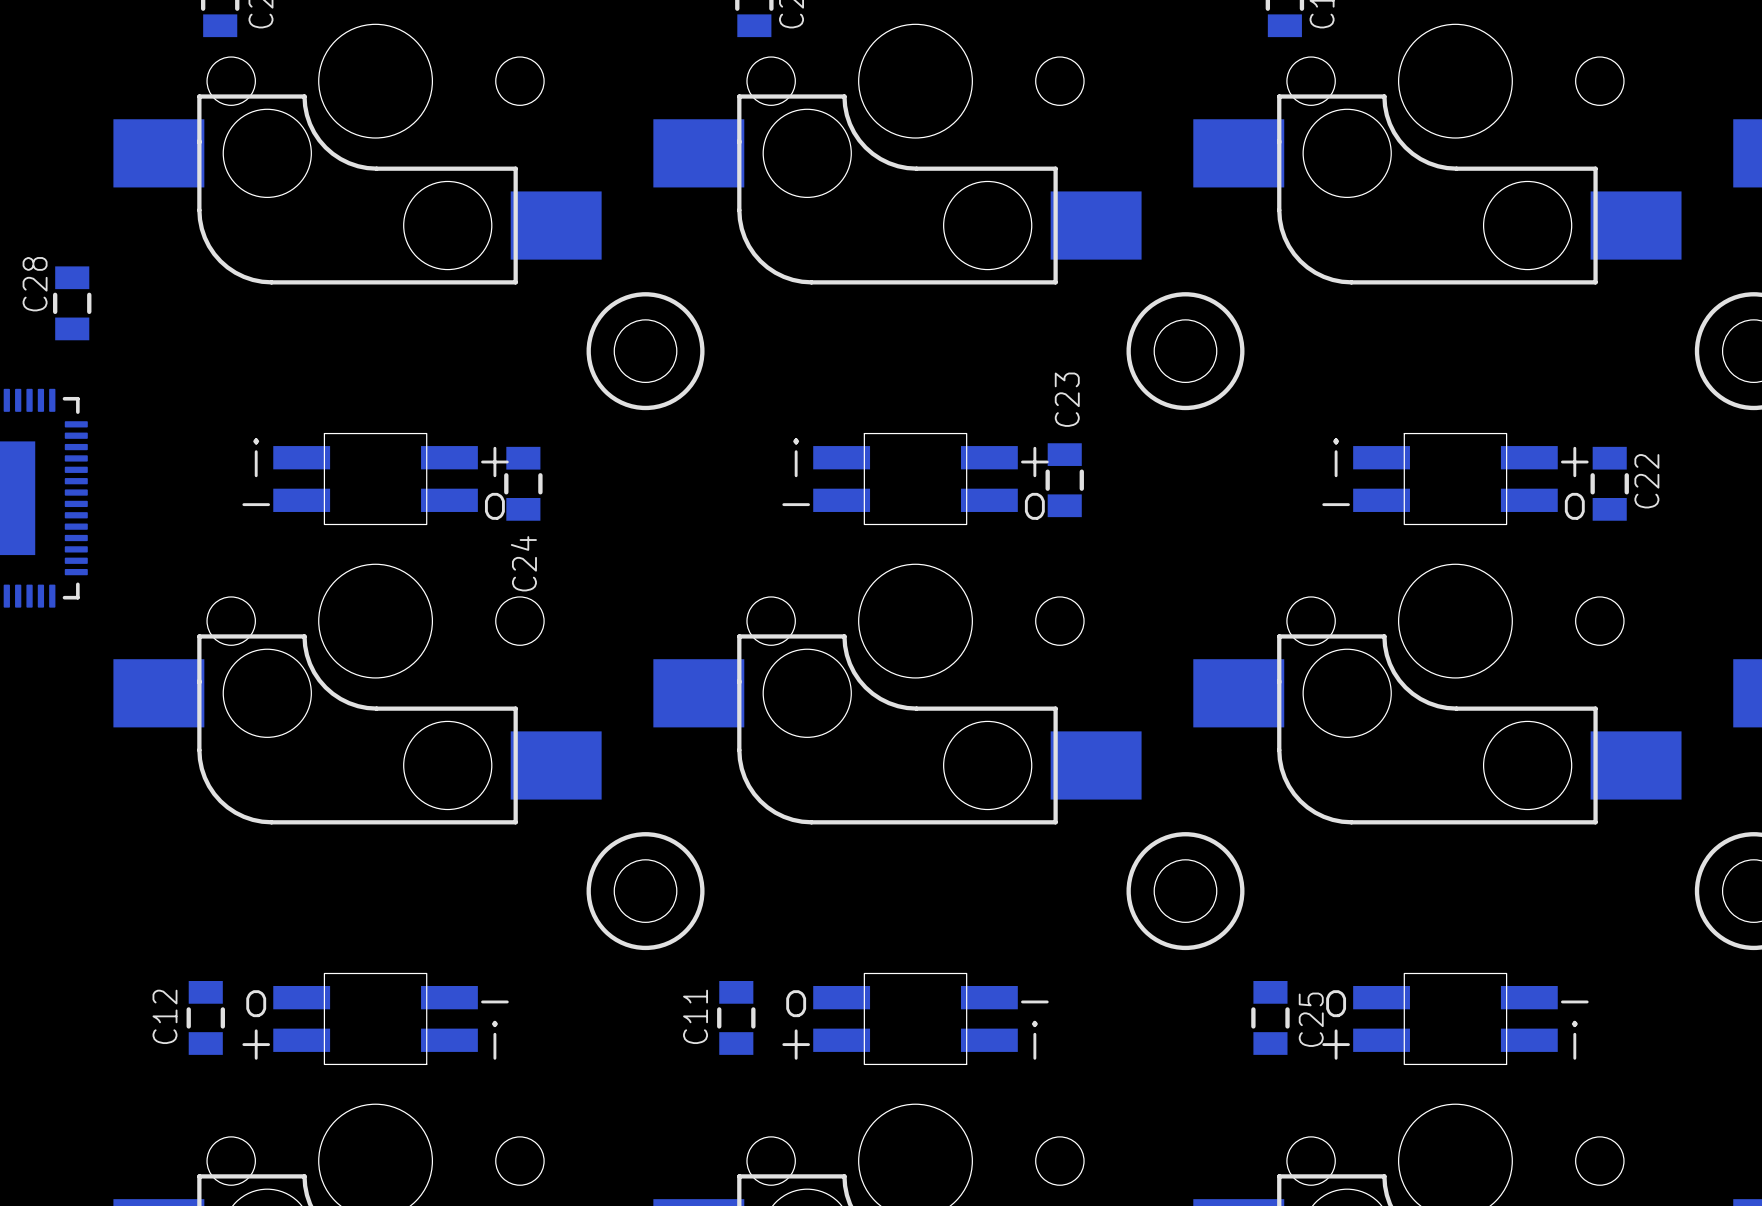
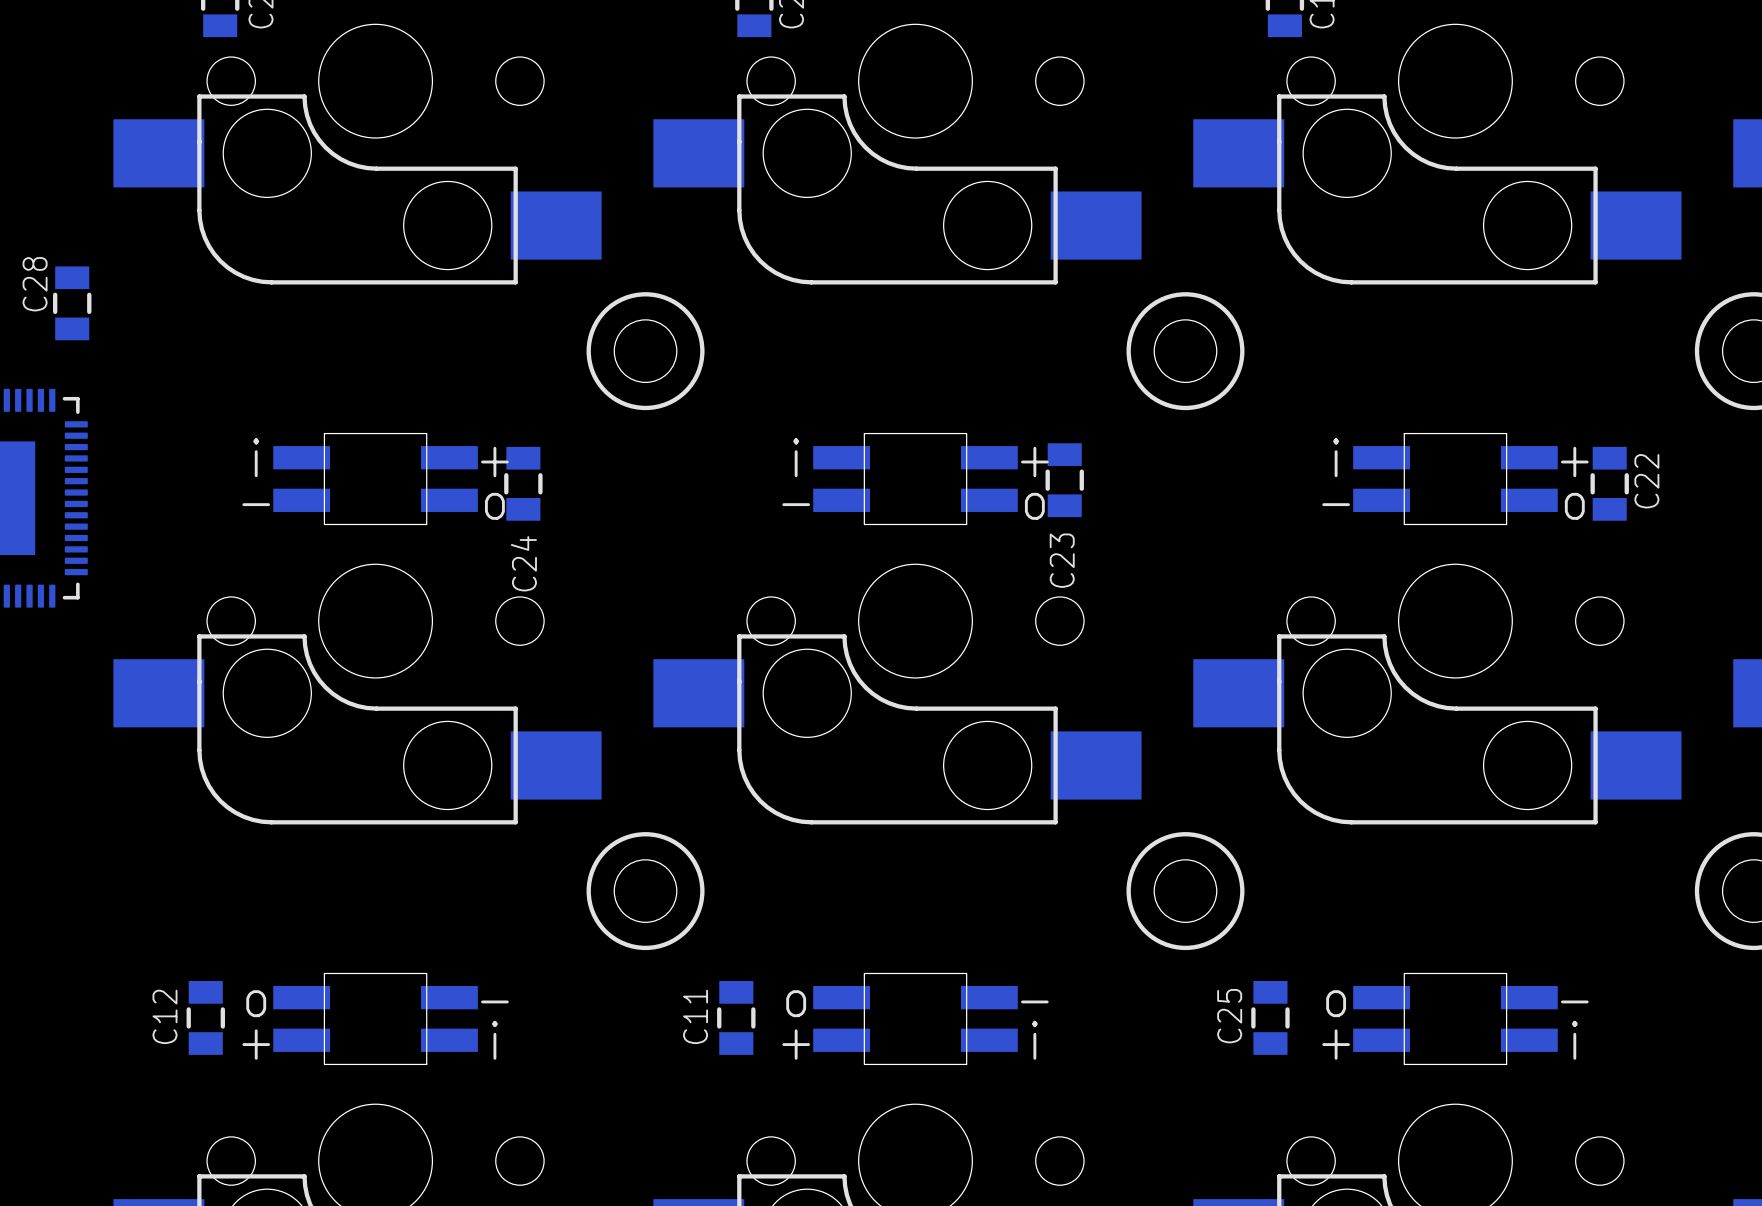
C23 name position: C23 (1067, 399) -> C23 (1062, 560)
C25 name position: C25 (1311, 1019) -> C25 (1229, 1016)

